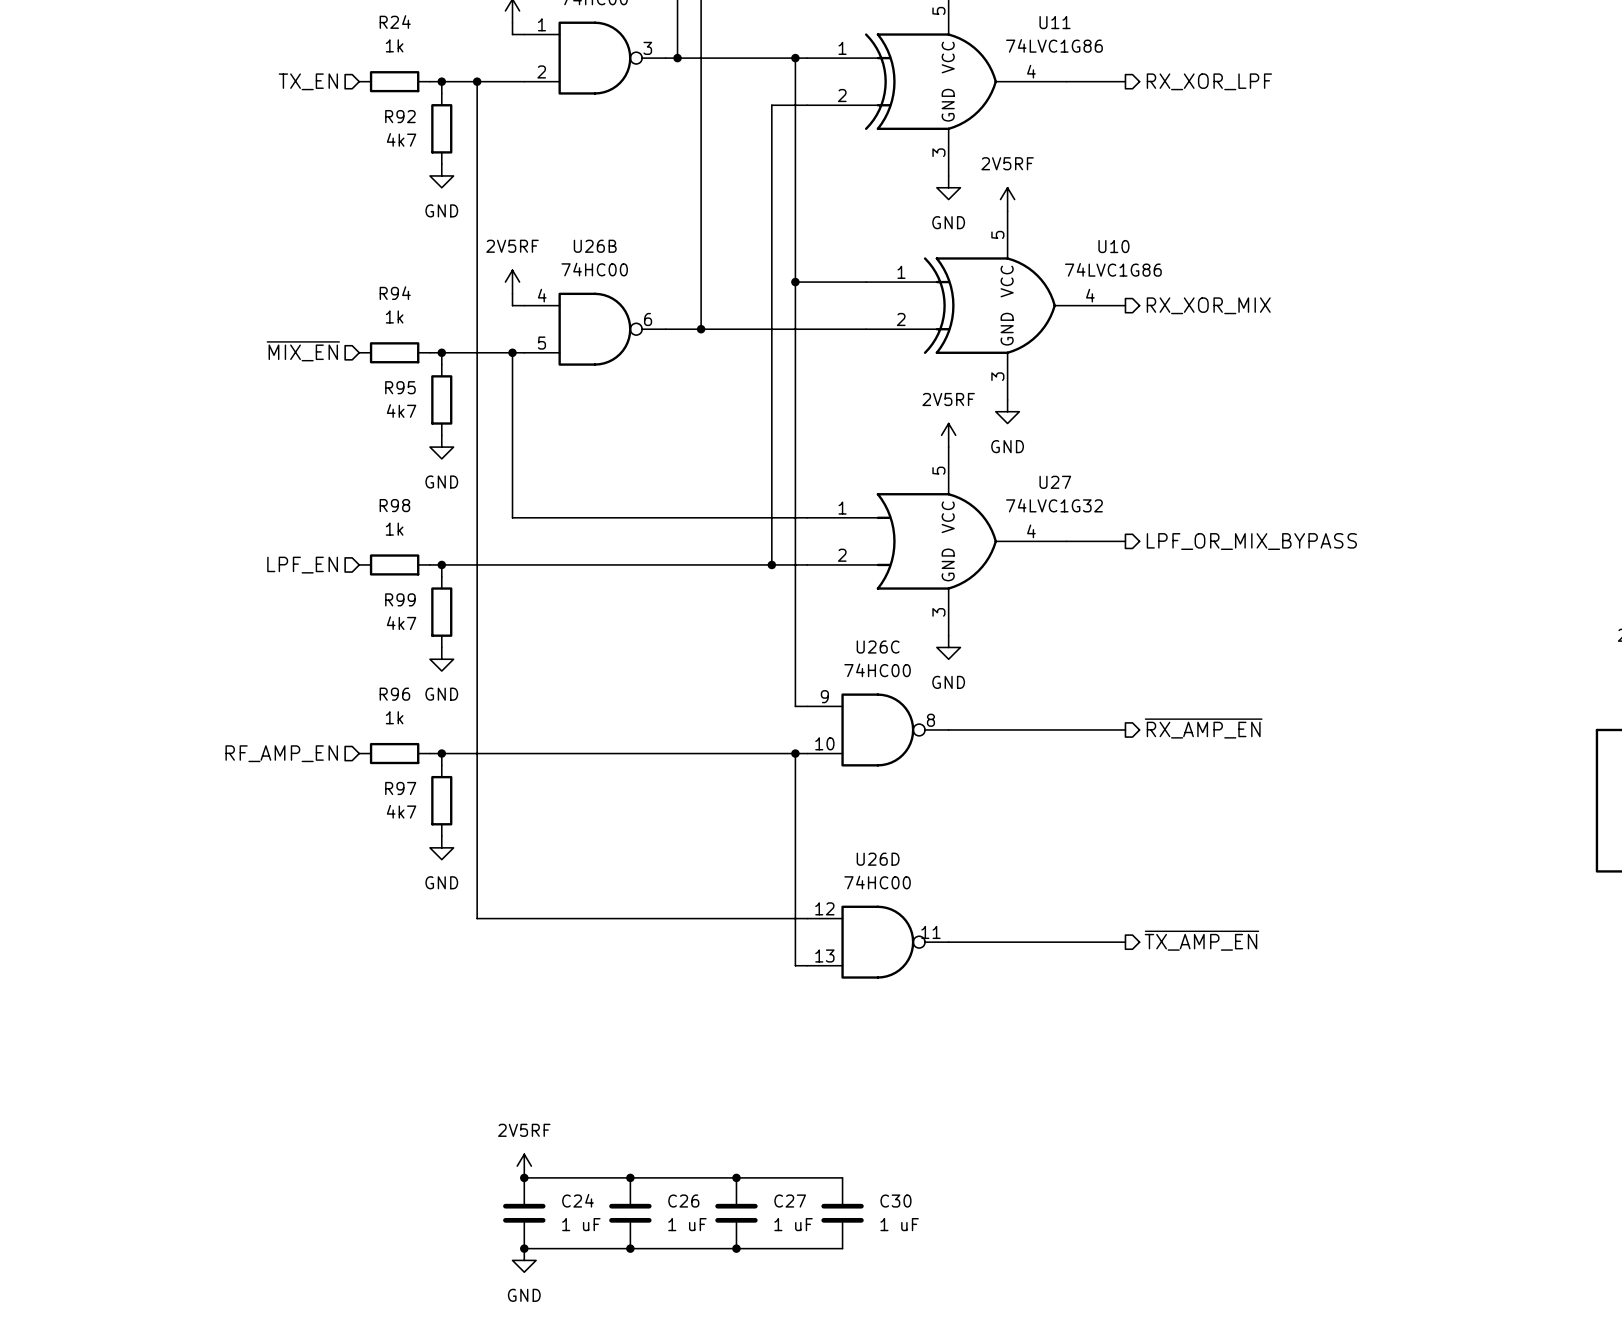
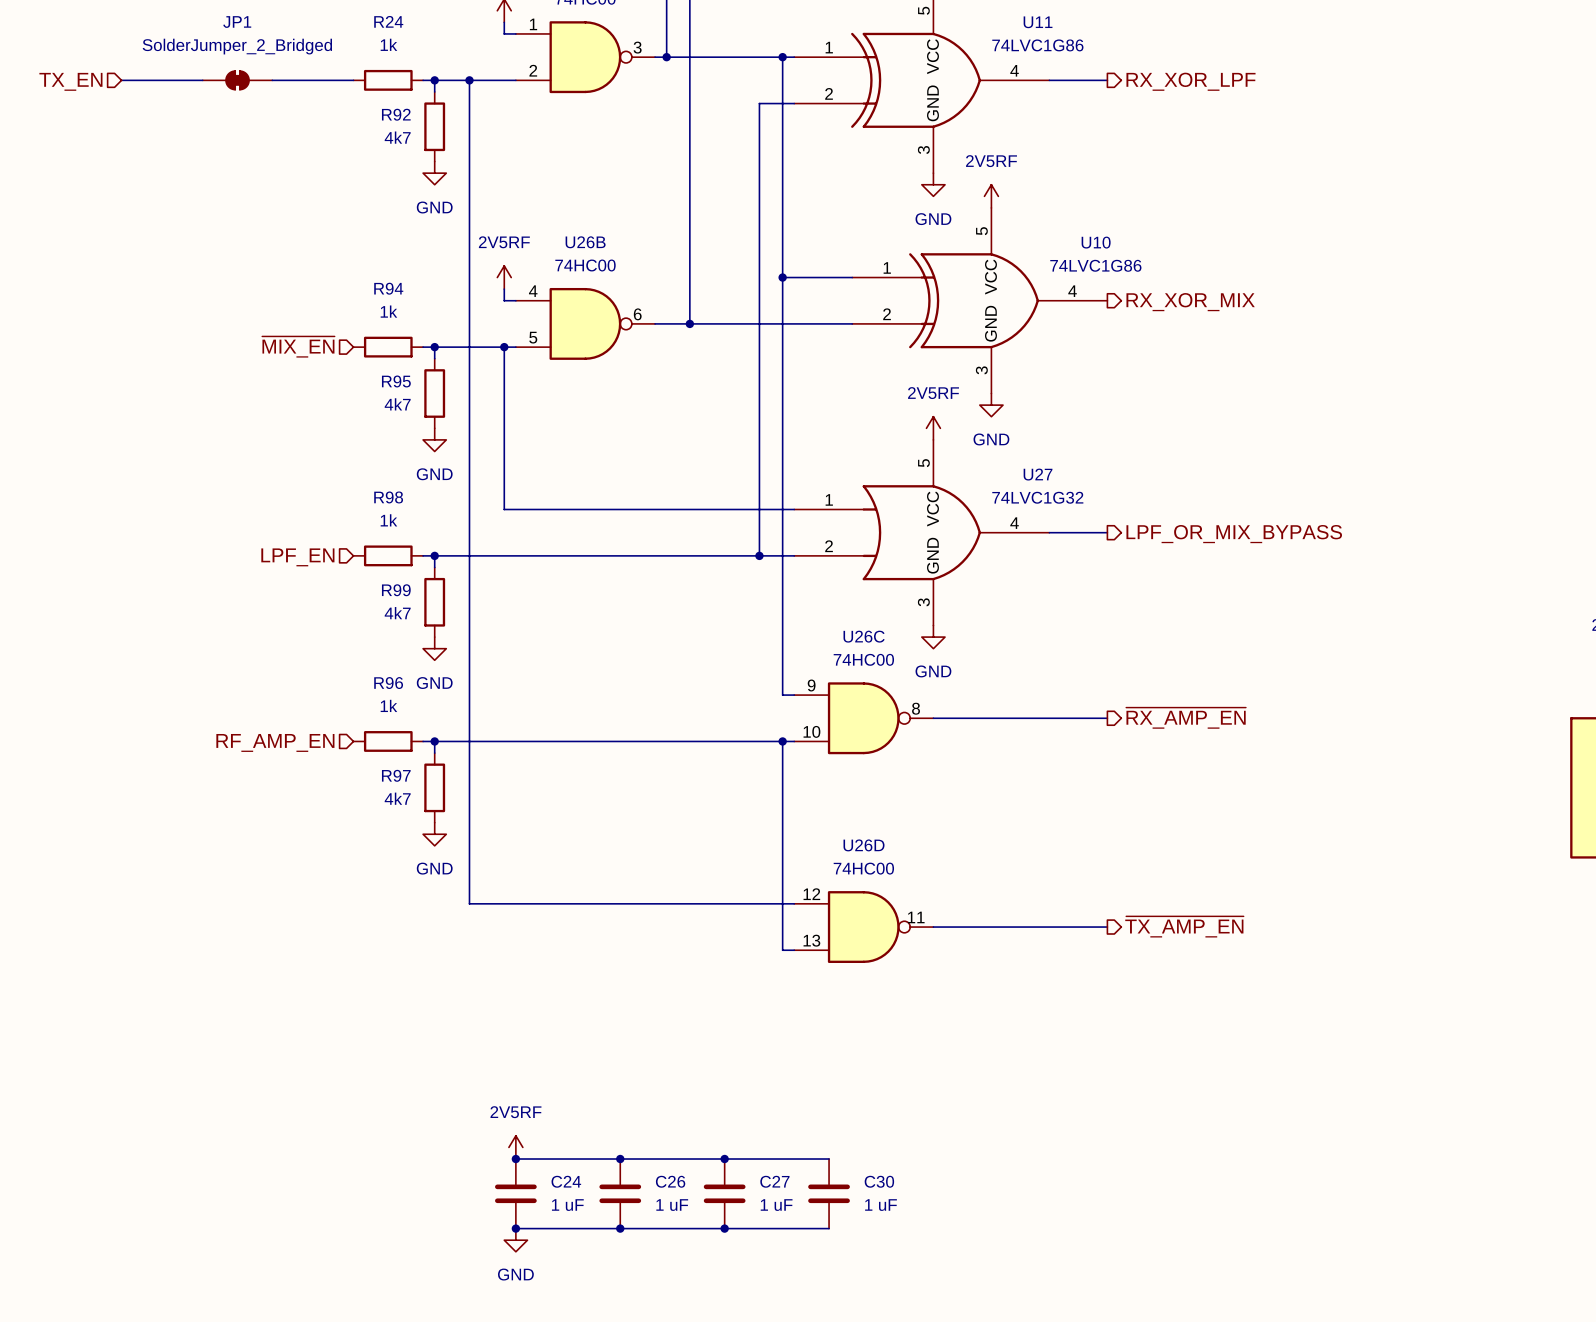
hierarchical label: none -> TX_EN (70, 81)
wire: none -> (121, 80) (202, 80)
JP1: none -> SolderJumper_2_Bridged (237, 80)
wire: none -> (272, 80) (353, 80)
hierarchical label: TX_EN (308, 81) -> none

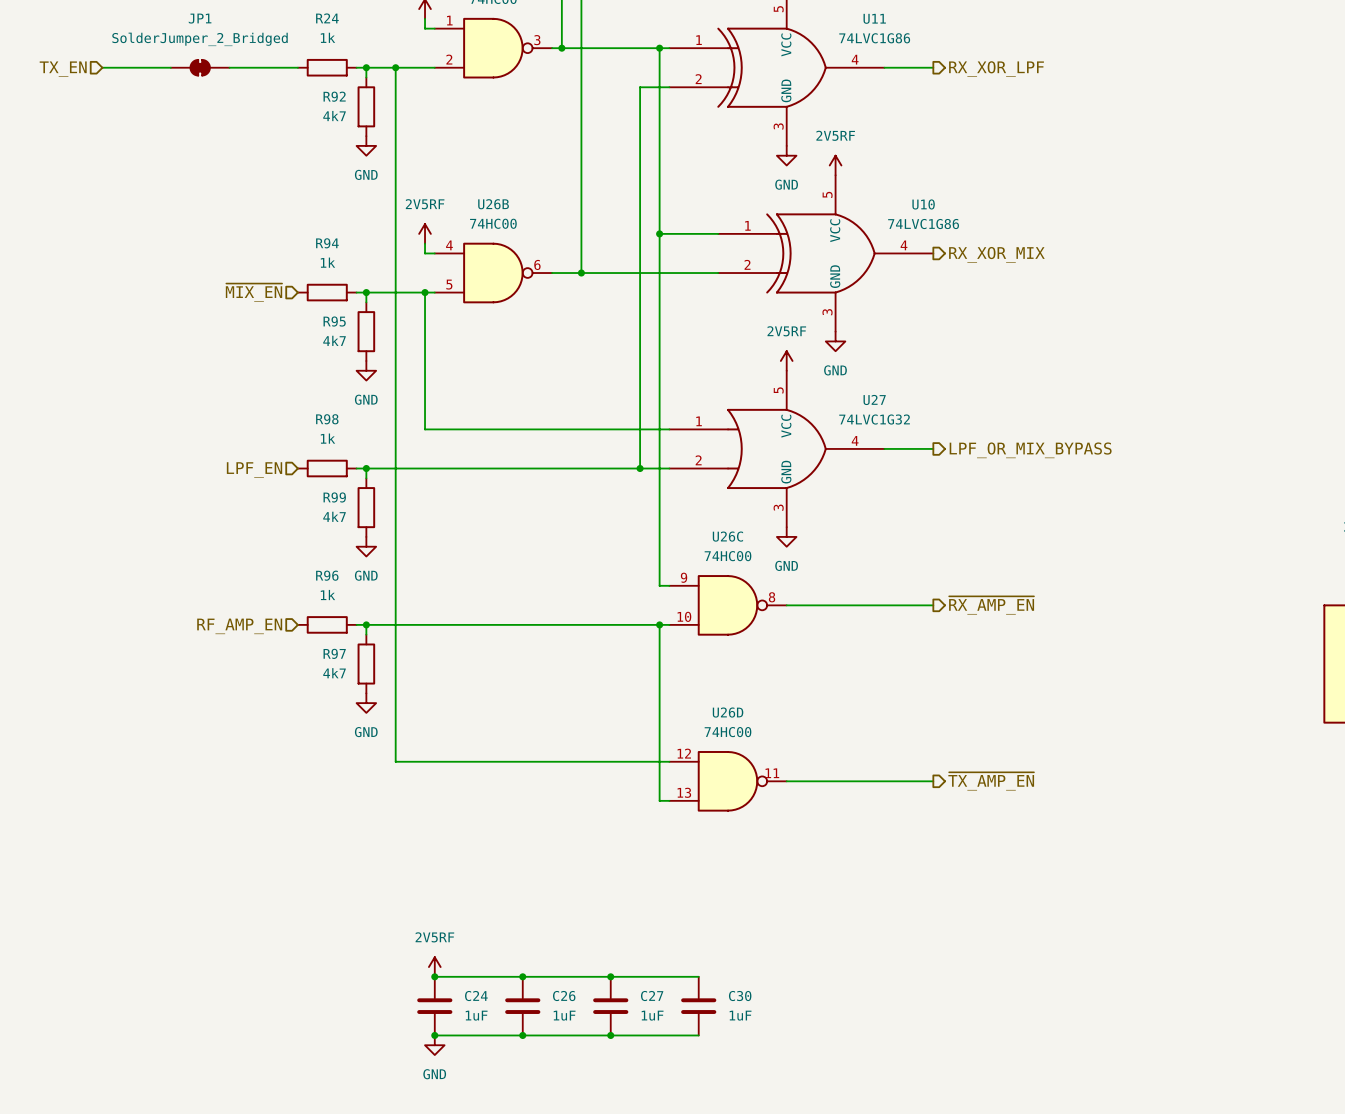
C24 value: 1 uF (567, 1205) -> 1uF (476, 1015)
C26 value: 1 uF (672, 1205) -> 1uF (564, 1015)
C27 value: 1 uF (776, 1205) -> 1uF (652, 1015)
C30 value: 1 uF (881, 1205) -> 1uF (740, 1015)

